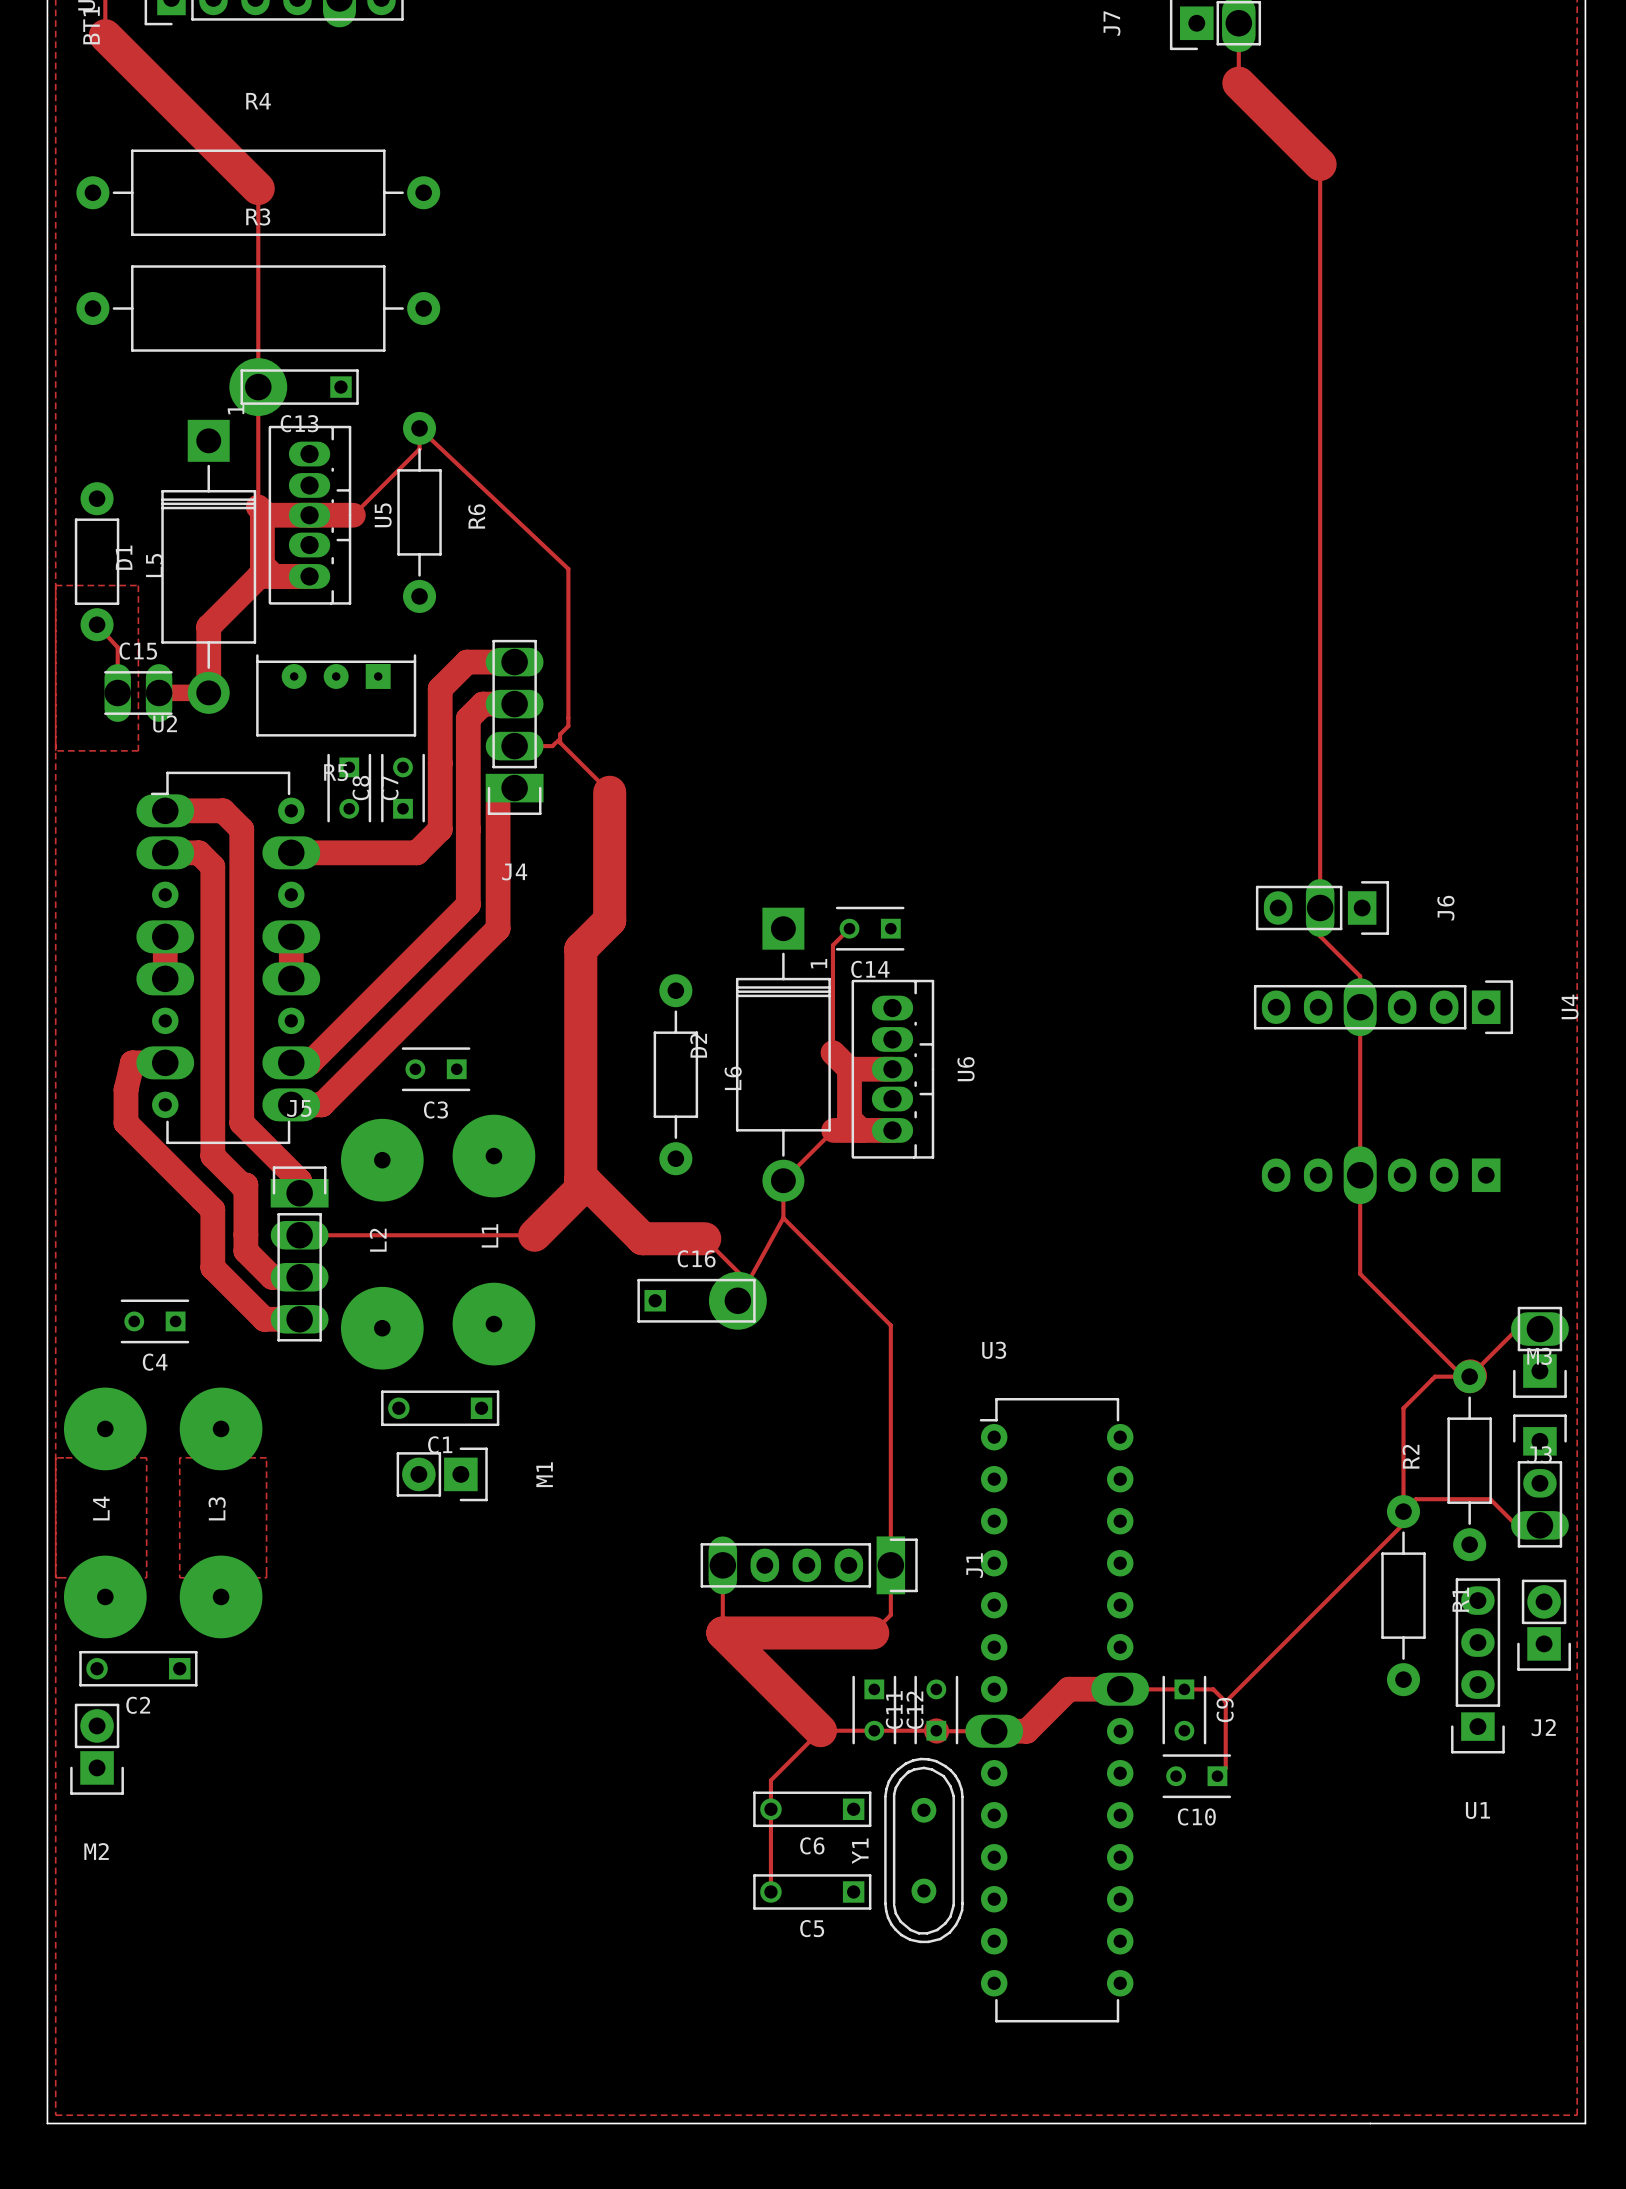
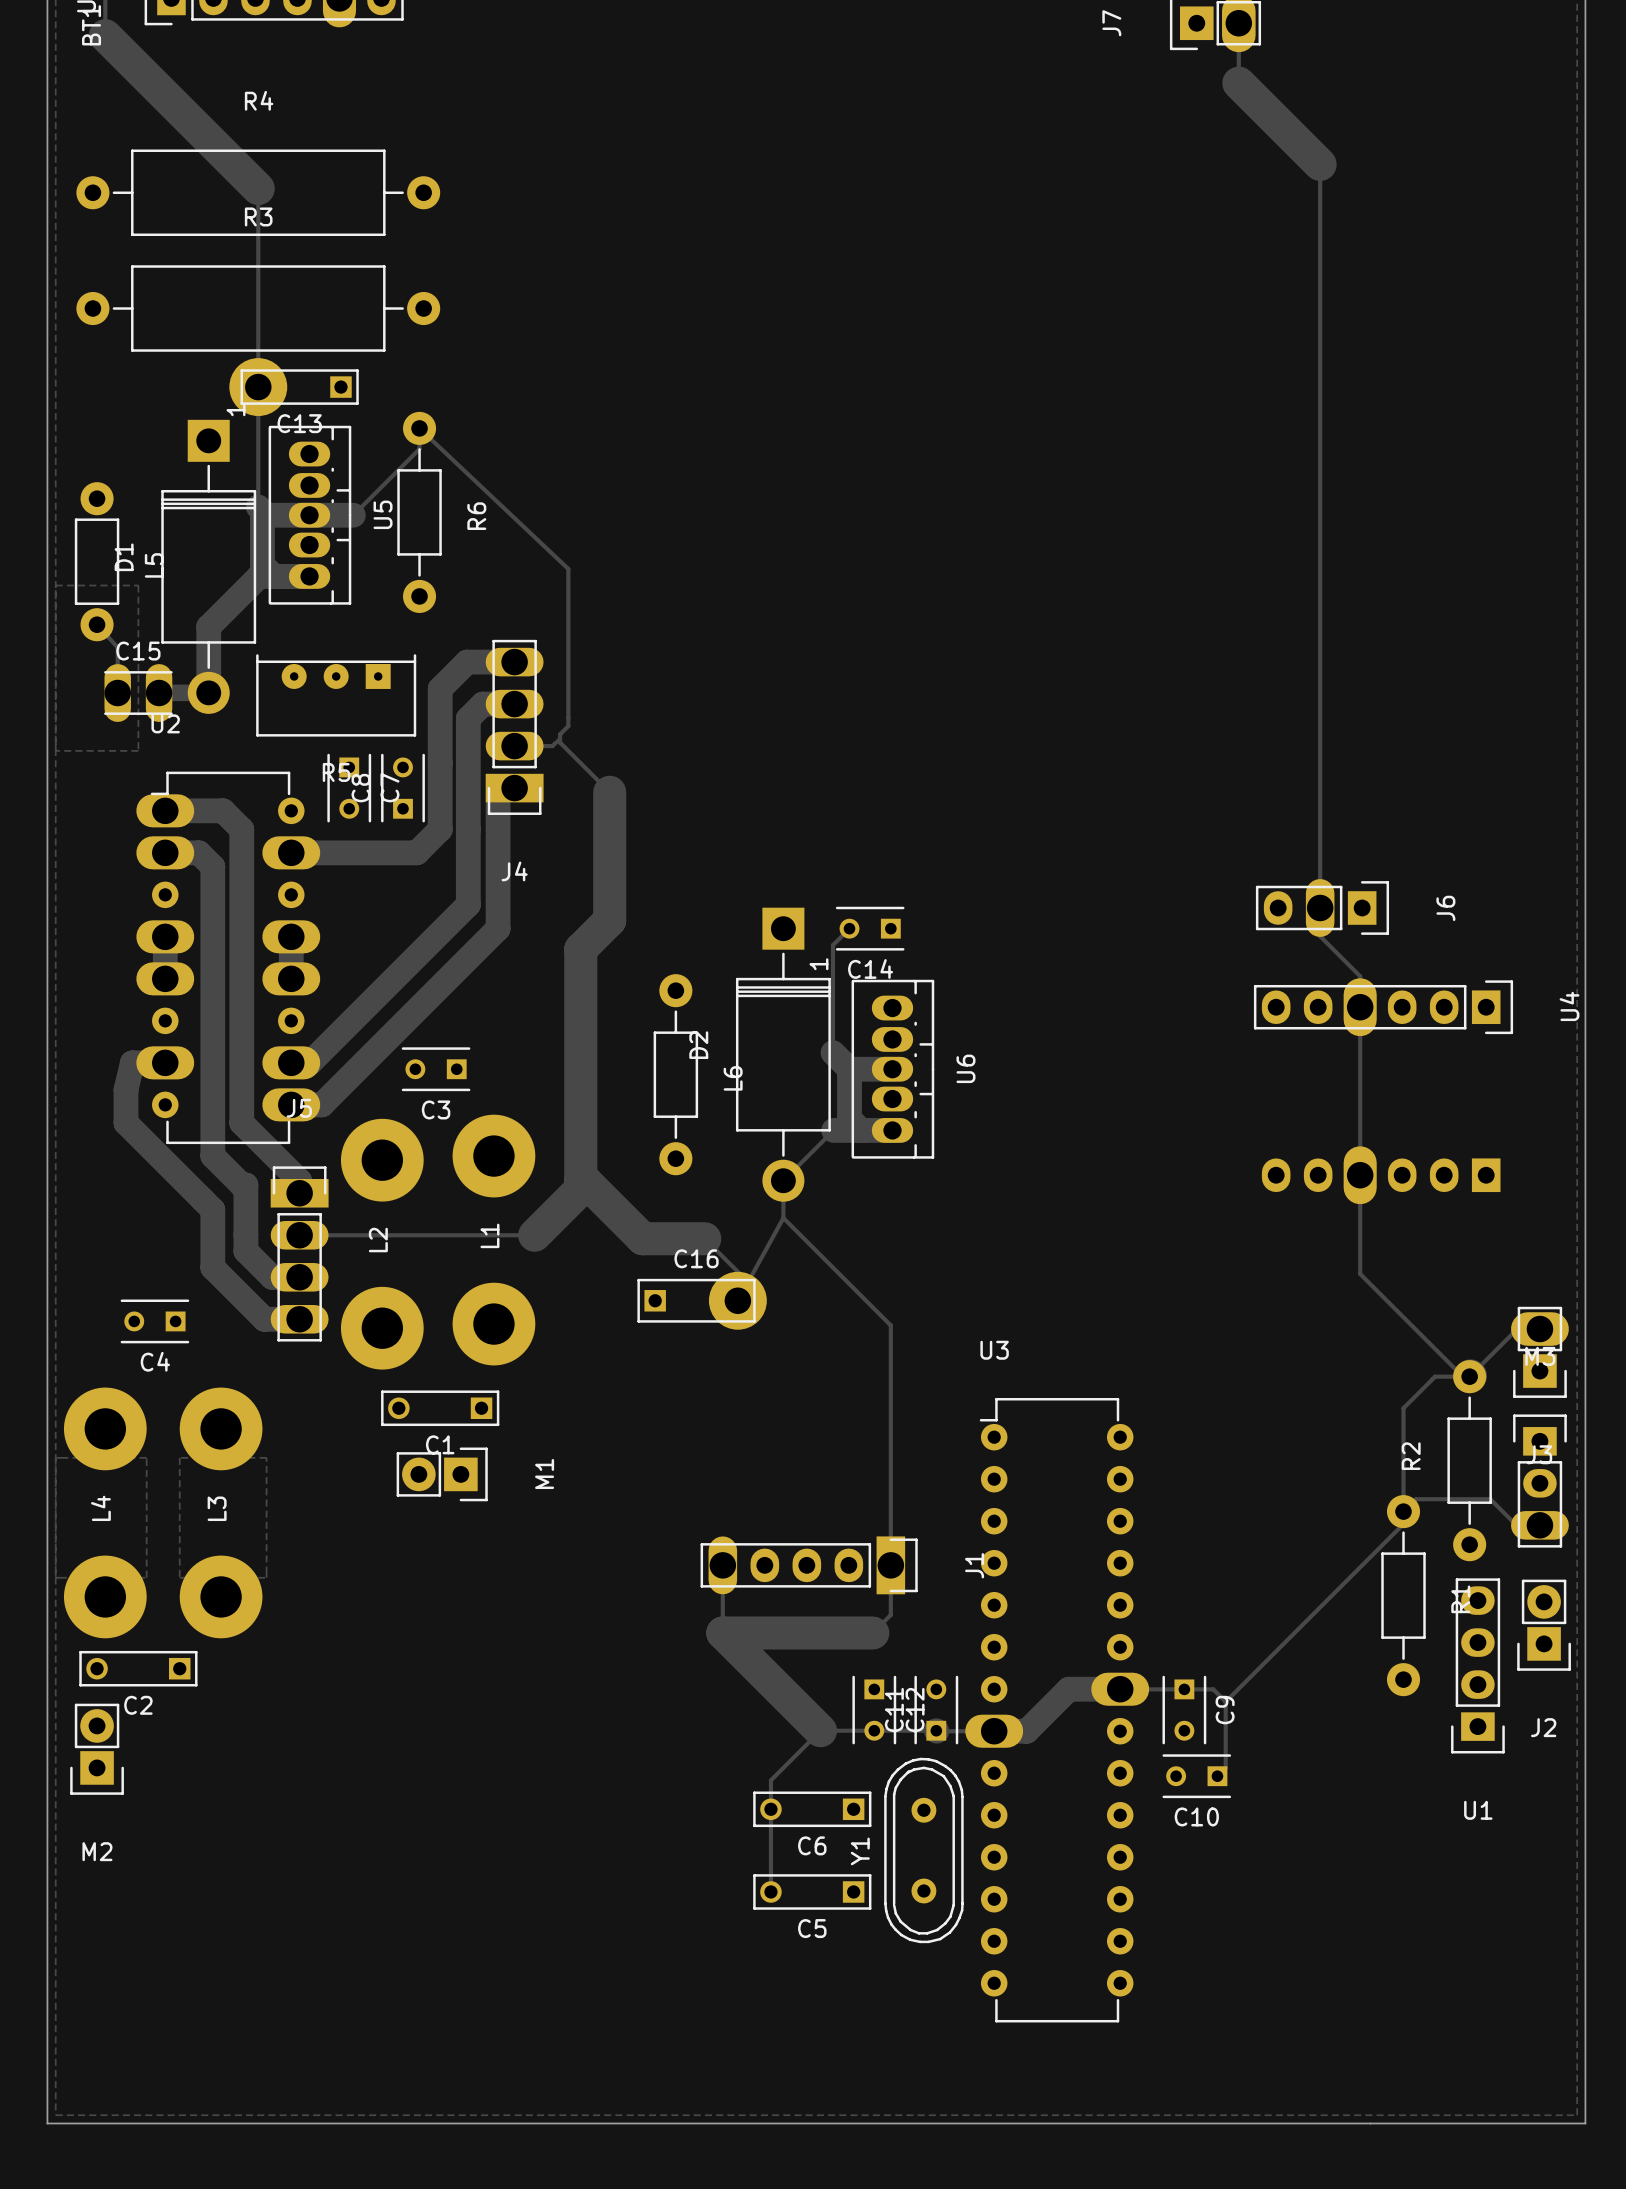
L1 footprint: [452, 1114, 536, 1366] -> [452, 1114, 536, 1366]
L2 footprint: [340, 1118, 424, 1370] -> [340, 1118, 424, 1370]
L4 footprint: [63, 1387, 147, 1639] -> [63, 1387, 147, 1639]
L3 footprint: [179, 1387, 263, 1639] -> [179, 1387, 263, 1639]

